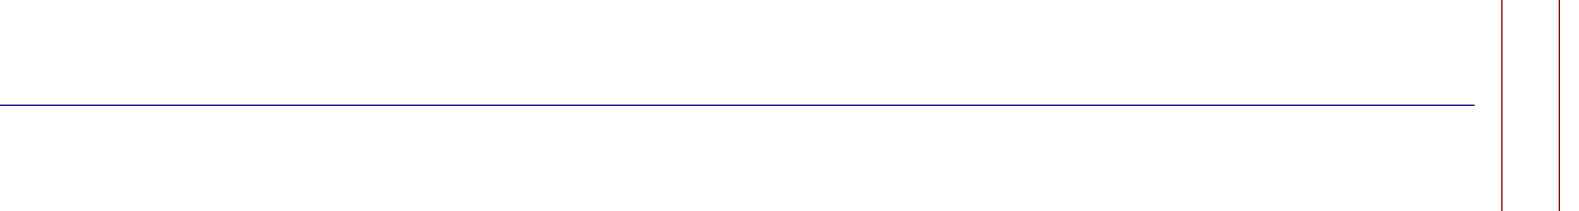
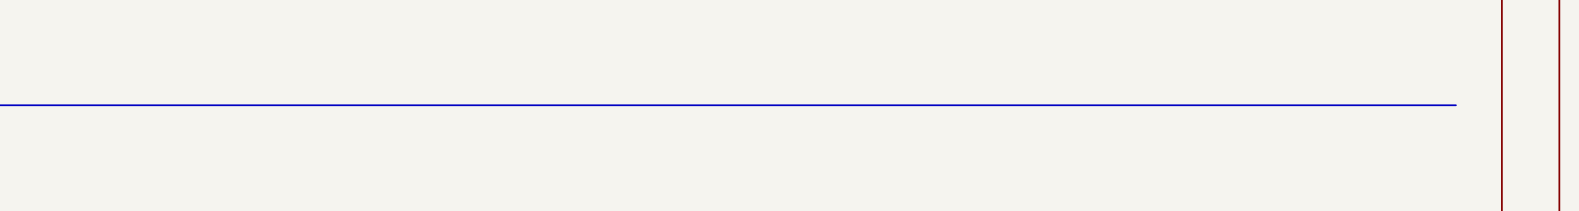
line: (1455, 105) (1474, 105) -> none

